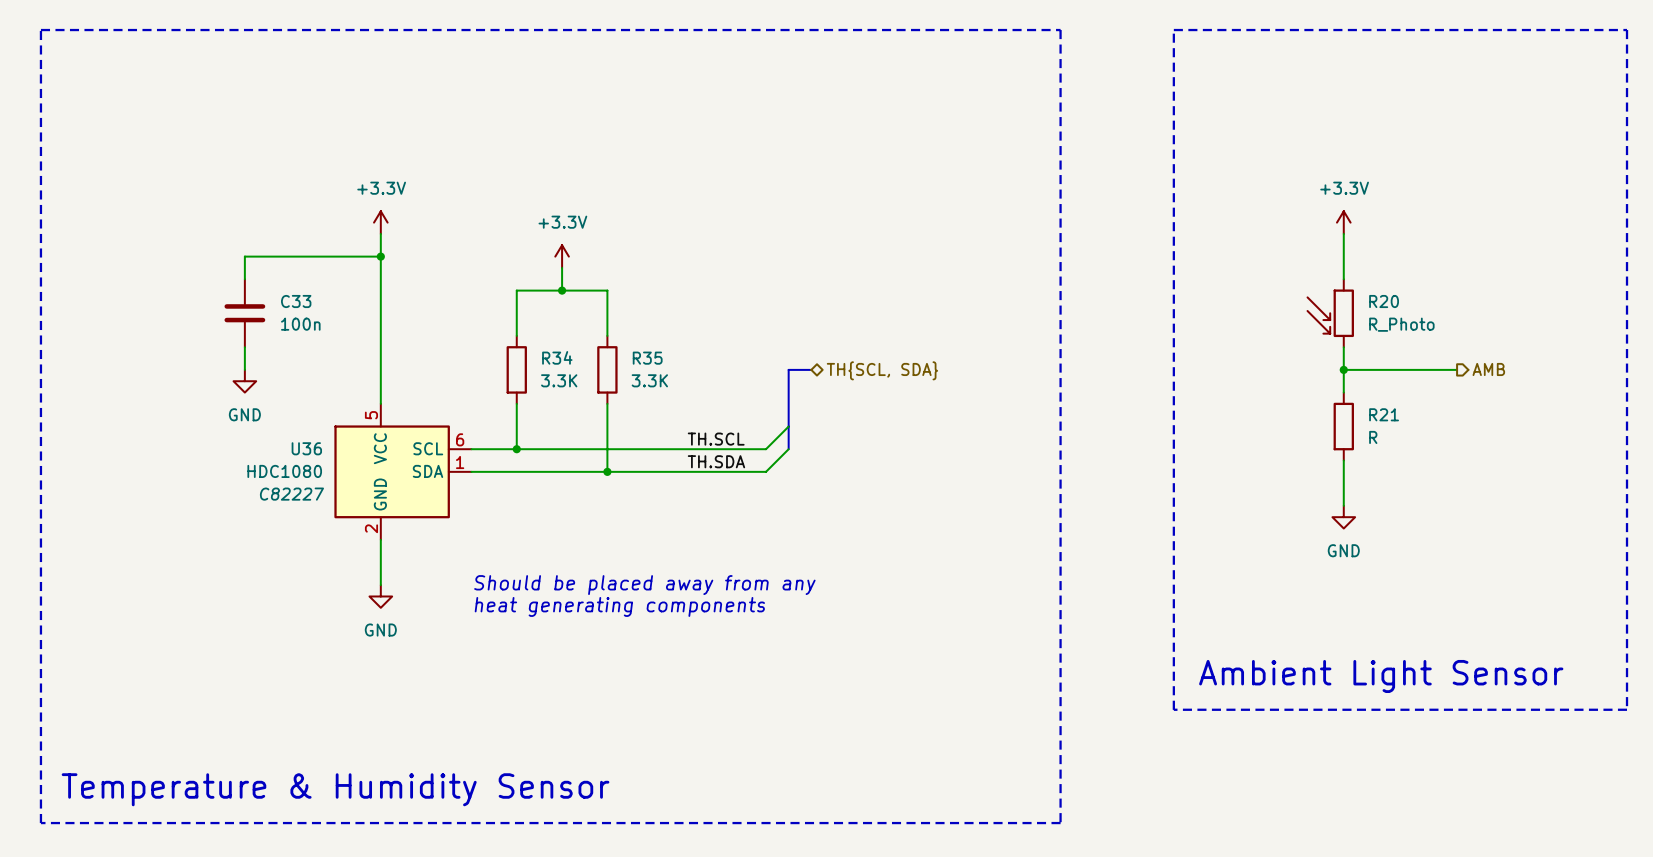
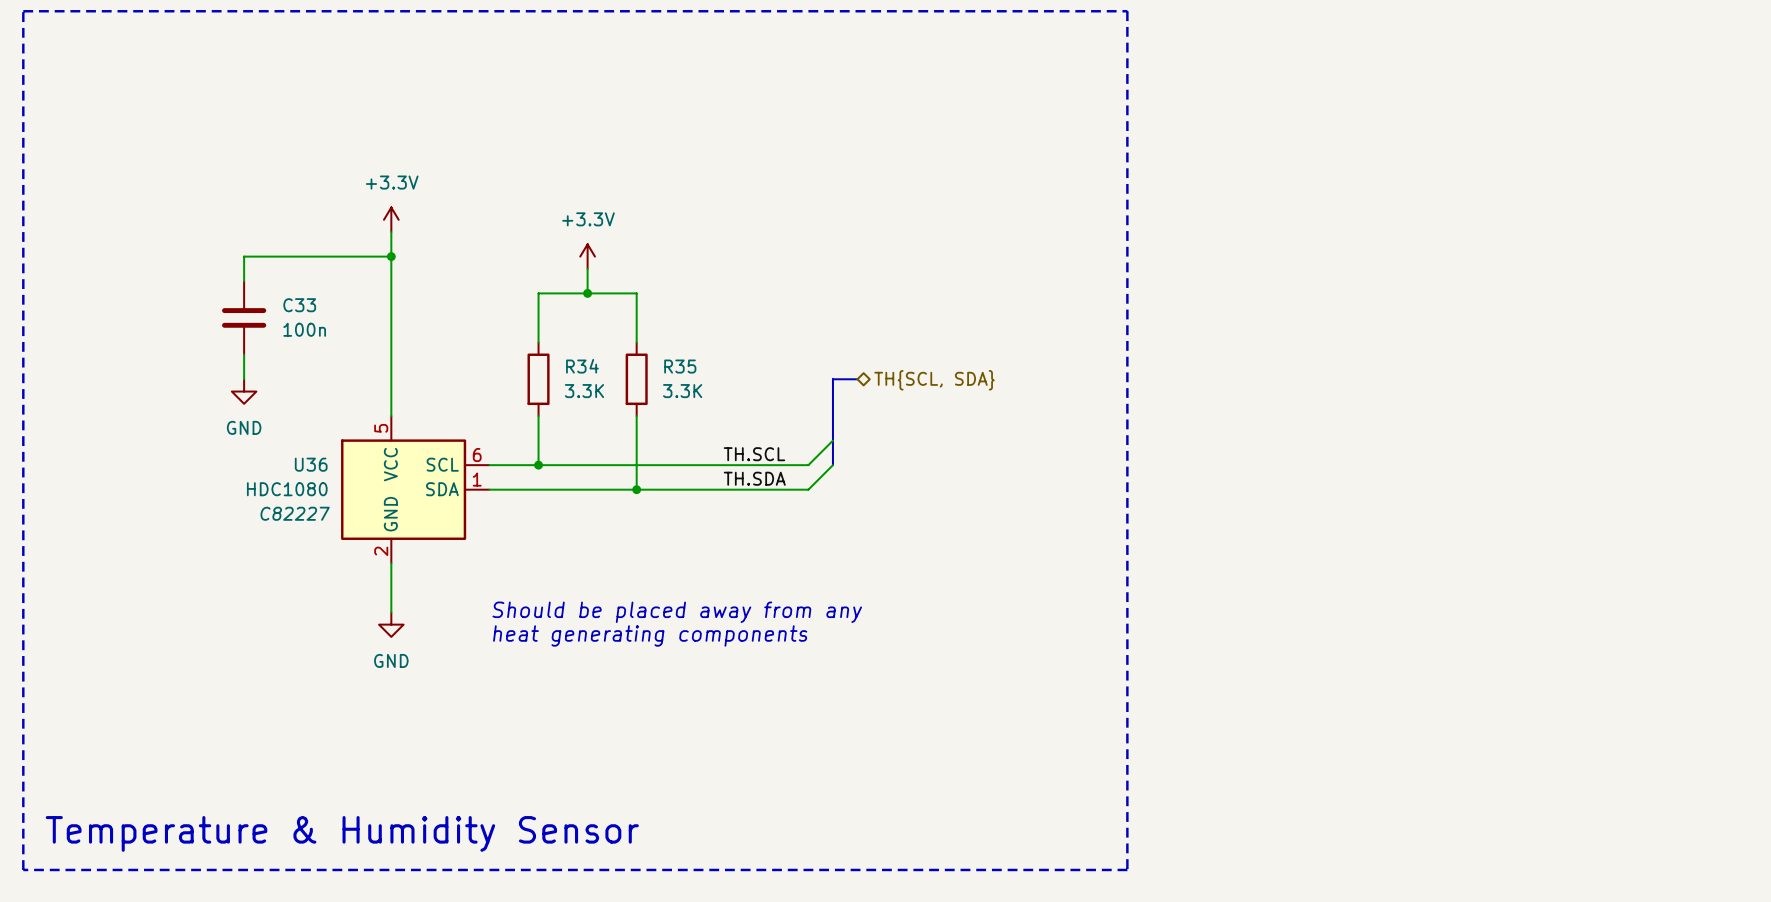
line: (1173, 30) (1627, 30) (1627, 709) (1173, 709) (1173, 30) -> none
power symbol: +3.3V (1343, 222) -> none
wire: (1343, 233) (1343, 279) -> none
R20: R_Photo (1330, 313) -> none
wire: (1343, 347) (1343, 392) -> none
wire: (1343, 369) (1457, 369) -> none
junction: (1343, 369) -> none
hierarchical label: AMB (1488, 369) -> none
R21: R (1343, 426) -> none
wire: (1343, 460) (1343, 505) -> none
power symbol: GND (1343, 517) -> none
text: Ambient Light Sensor (1381, 676) -> none

